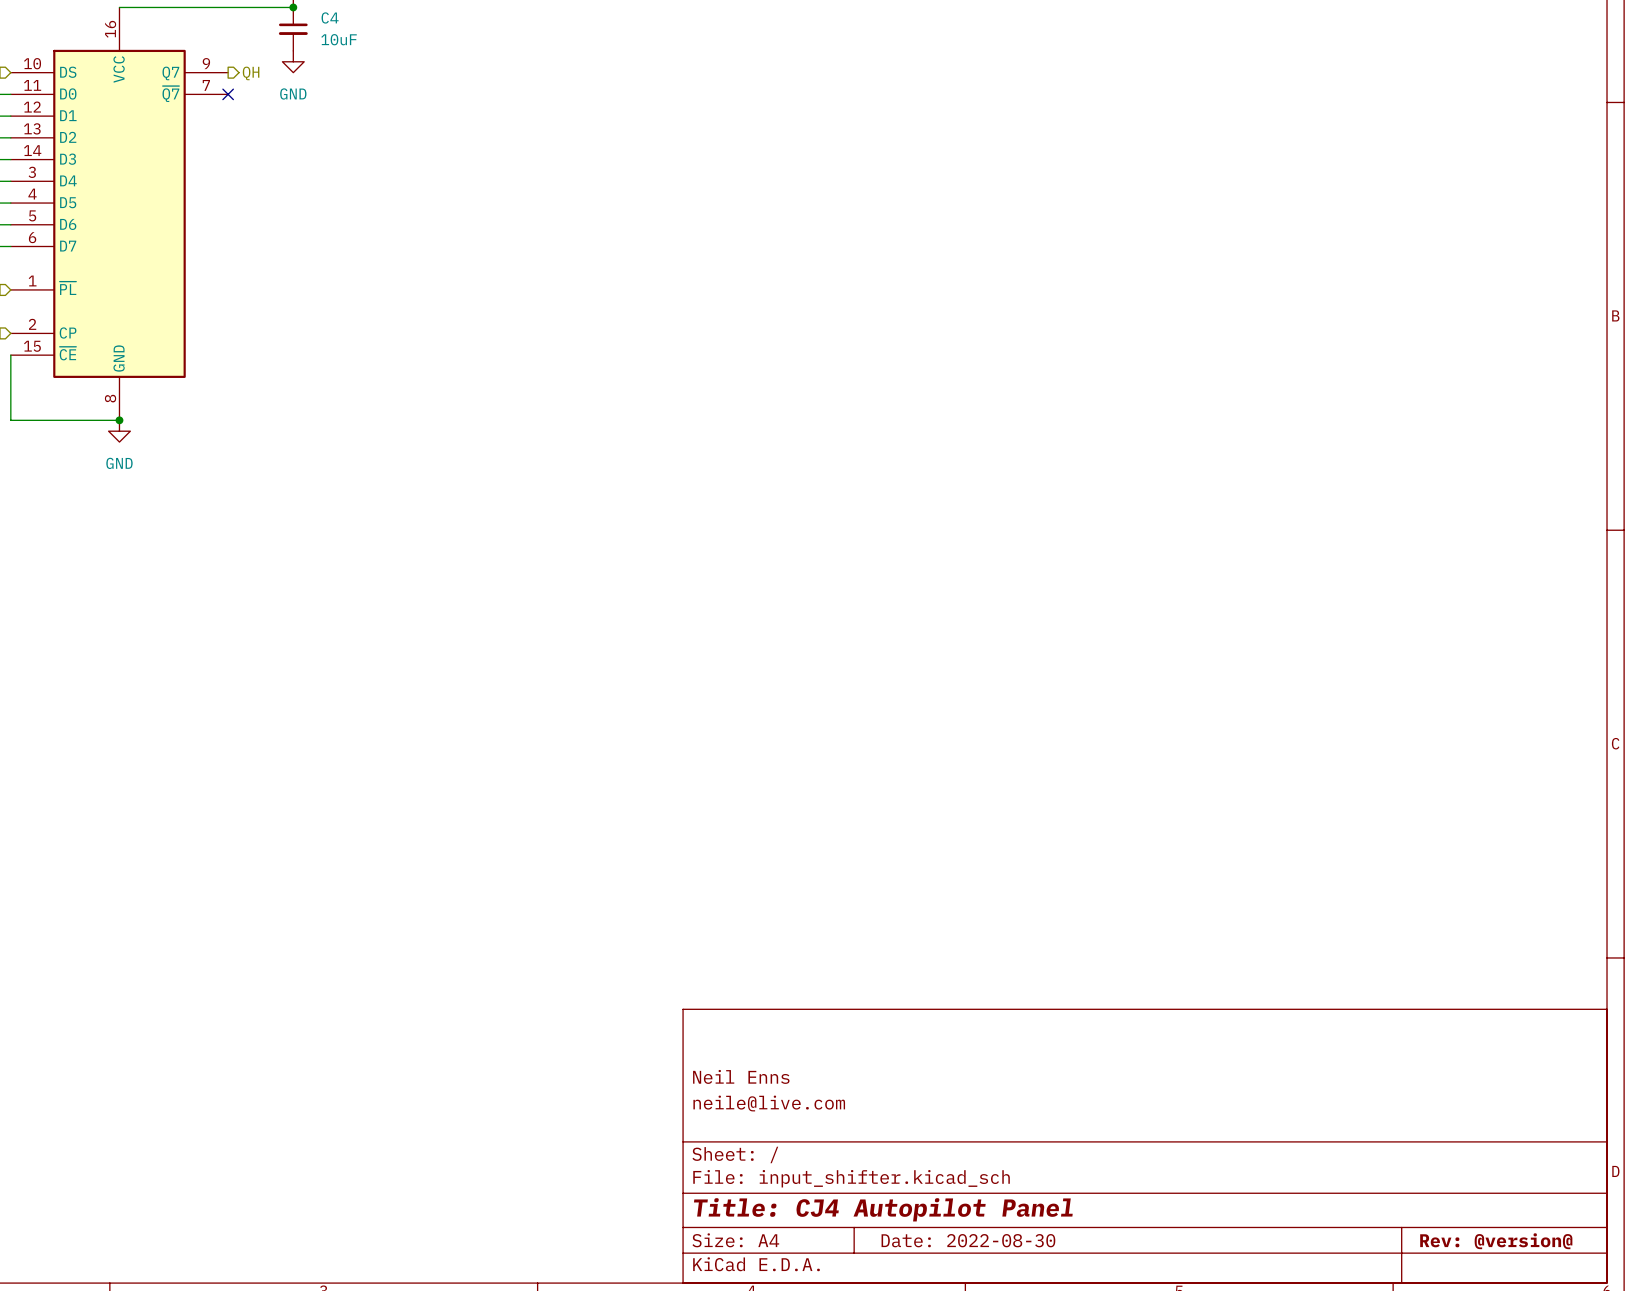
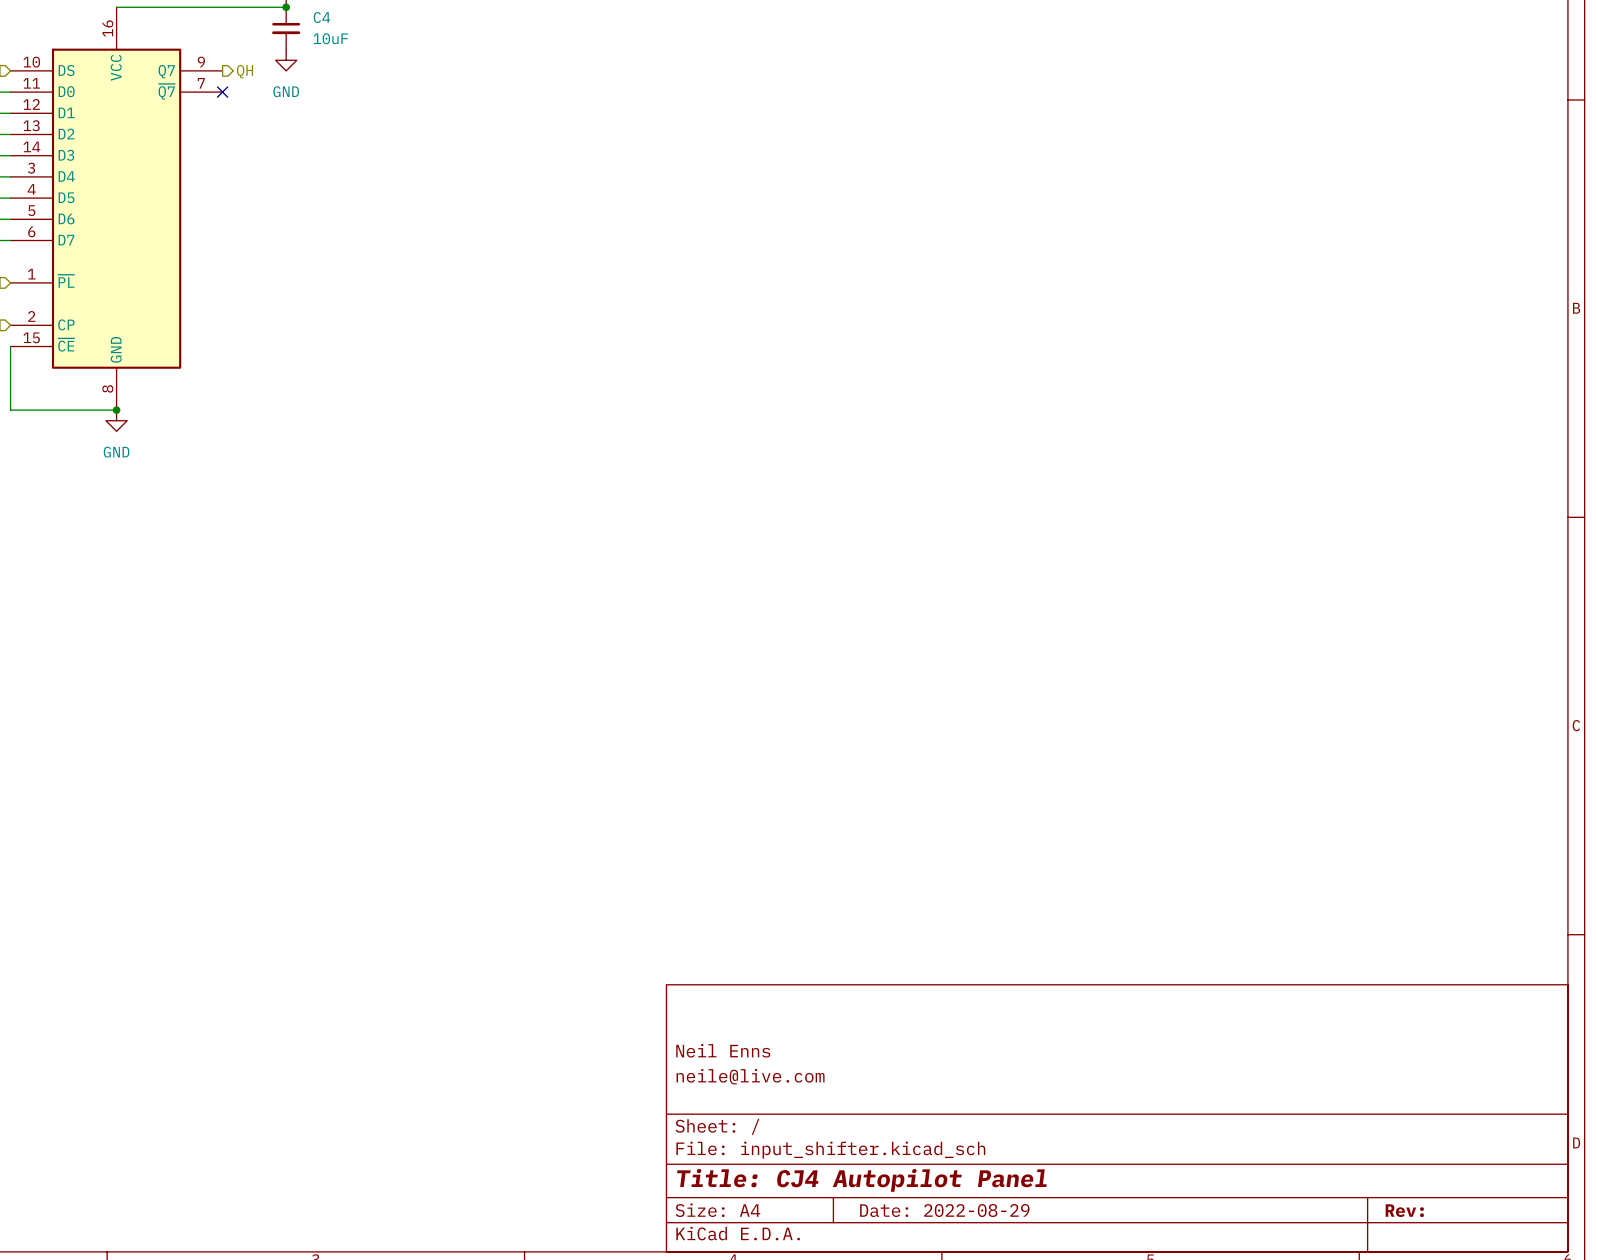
title block: Date: 2022-08-30 (968, 1240) -> Date: 2022-08-29 (944, 1210)
title block: Rev: @version@ (1496, 1241) -> Rev: (1404, 1210)

